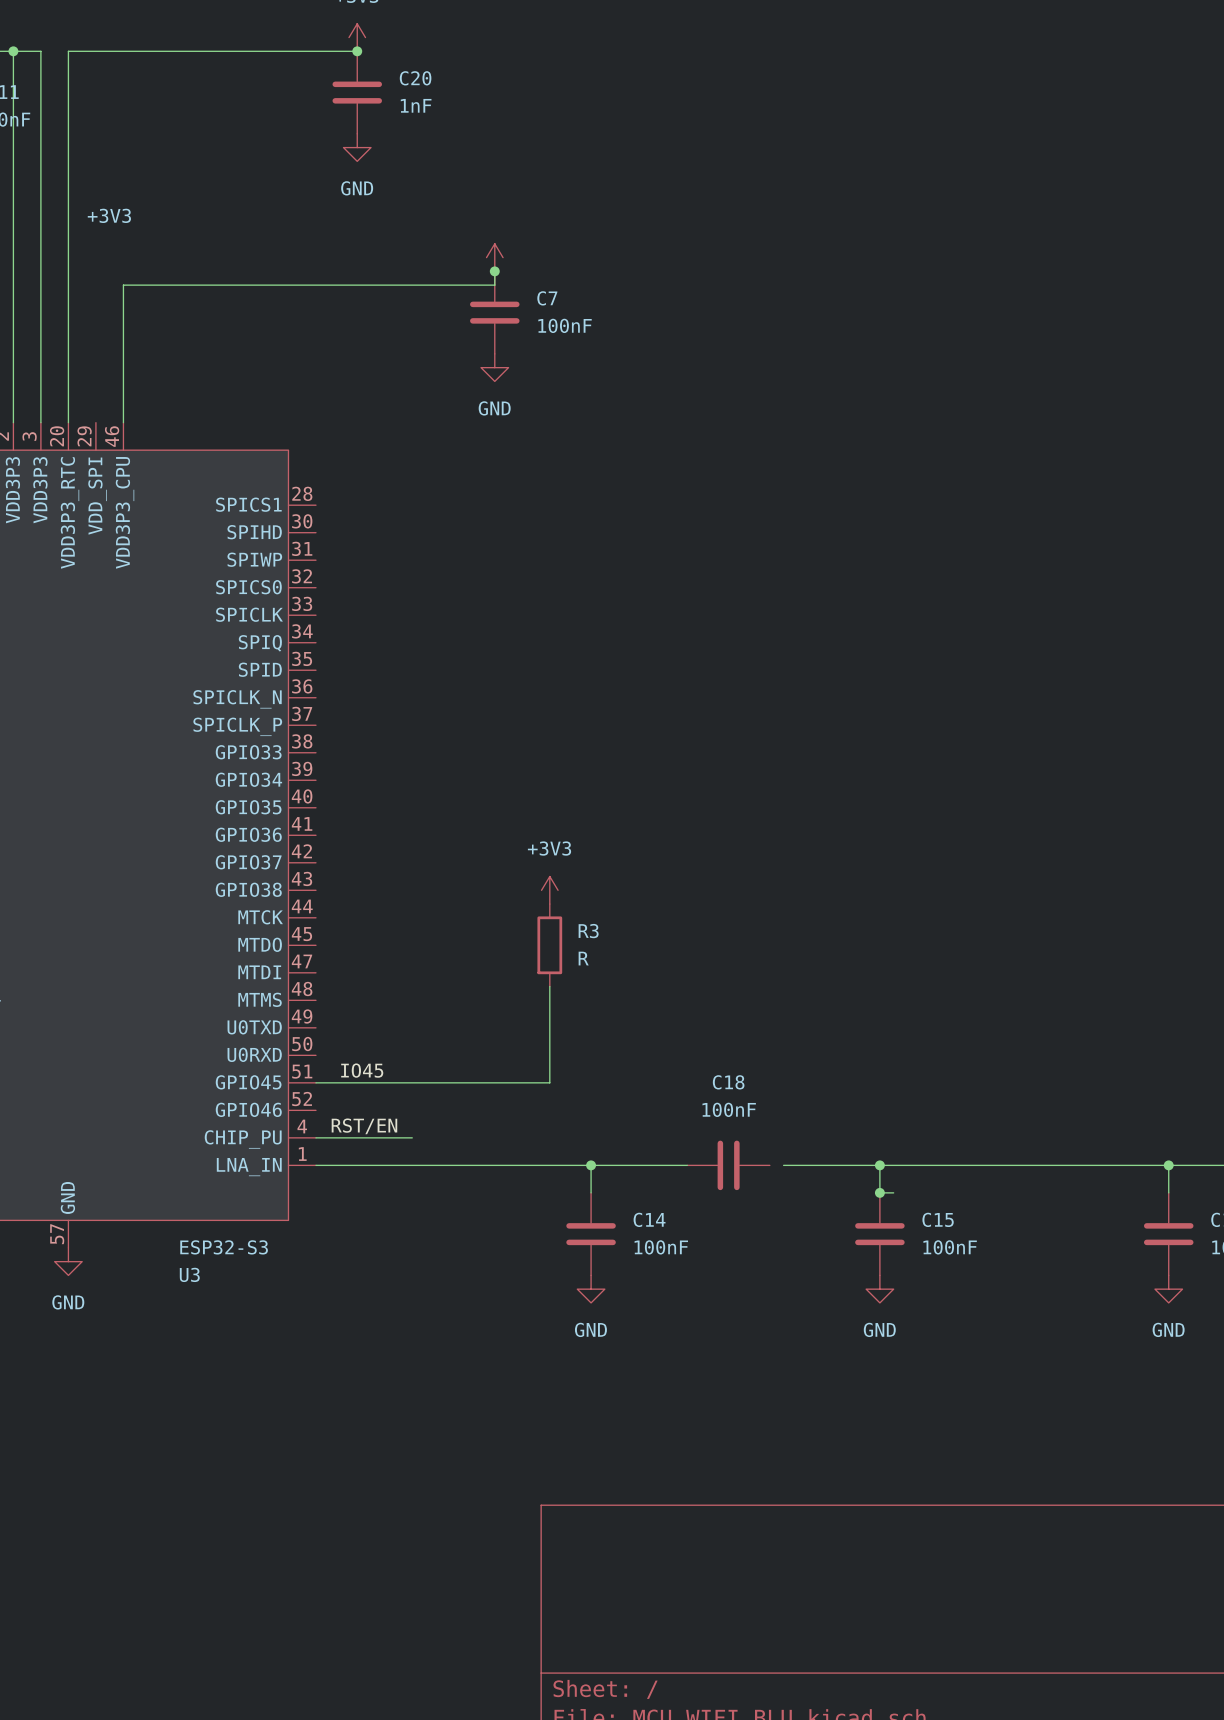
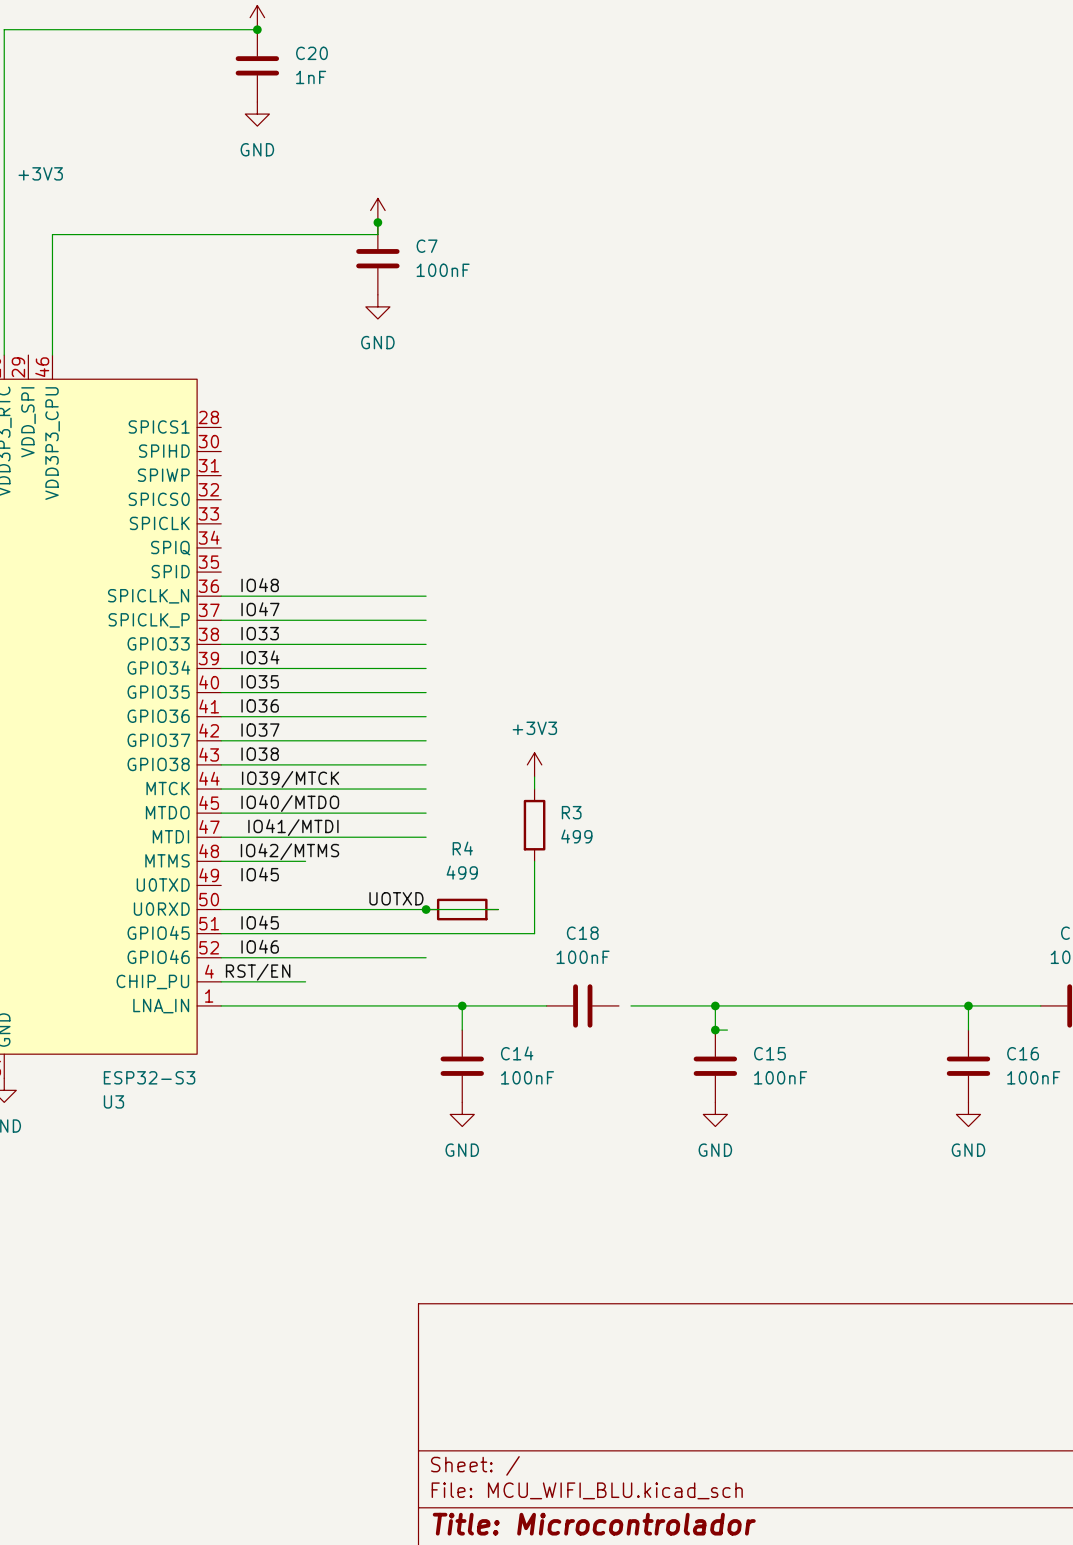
label: none -> IO48 (260, 585)
wire: none -> (221, 596) (426, 596)
label: none -> IO47 (260, 609)
wire: none -> (221, 620) (426, 620)
label: none -> IO33 (260, 633)
wire: none -> (221, 644) (426, 644)
label: none -> IO34 (260, 657)
wire: none -> (221, 668) (426, 668)
label: none -> IO35 (260, 681)
wire: none -> (221, 692) (426, 692)
label: none -> IO36 (260, 705)
wire: none -> (221, 716) (426, 716)
label: none -> IO37 (260, 730)
wire: none -> (221, 740) (426, 740)
label: none -> IO38 (260, 754)
wire: none -> (221, 764) (426, 764)
power symbol position: +3V3 (549, 890) -> +3V3 (534, 764)
wire: none -> (534, 776) (534, 789)
label: none -> IO39/MTCK (290, 779)
wire: none -> (221, 789) (426, 789)
label: none -> IO40/MTDO (290, 803)
wire: none -> (221, 813) (426, 813)
R3 position: (549, 945) -> (534, 825)
R3 value: R (583, 958) -> 499 (576, 836)
label: none -> IO41/MTDI (293, 827)
wire: none -> (221, 837) (426, 837)
wire: (549, 986) (549, 1082) -> (534, 861) (534, 933) (426, 933)
label: none -> IO42/MTMS (289, 851)
wire: none -> (221, 861) (305, 861)
label: none -> IO45 (260, 874)
label: none -> UOTXD (396, 898)
wire: none -> (221, 909) (498, 909)
junction: none -> (426, 909)
R4: none -> 499 (462, 909)
label: none -> IO46 (260, 946)
wire: none -> (221, 957) (426, 957)

